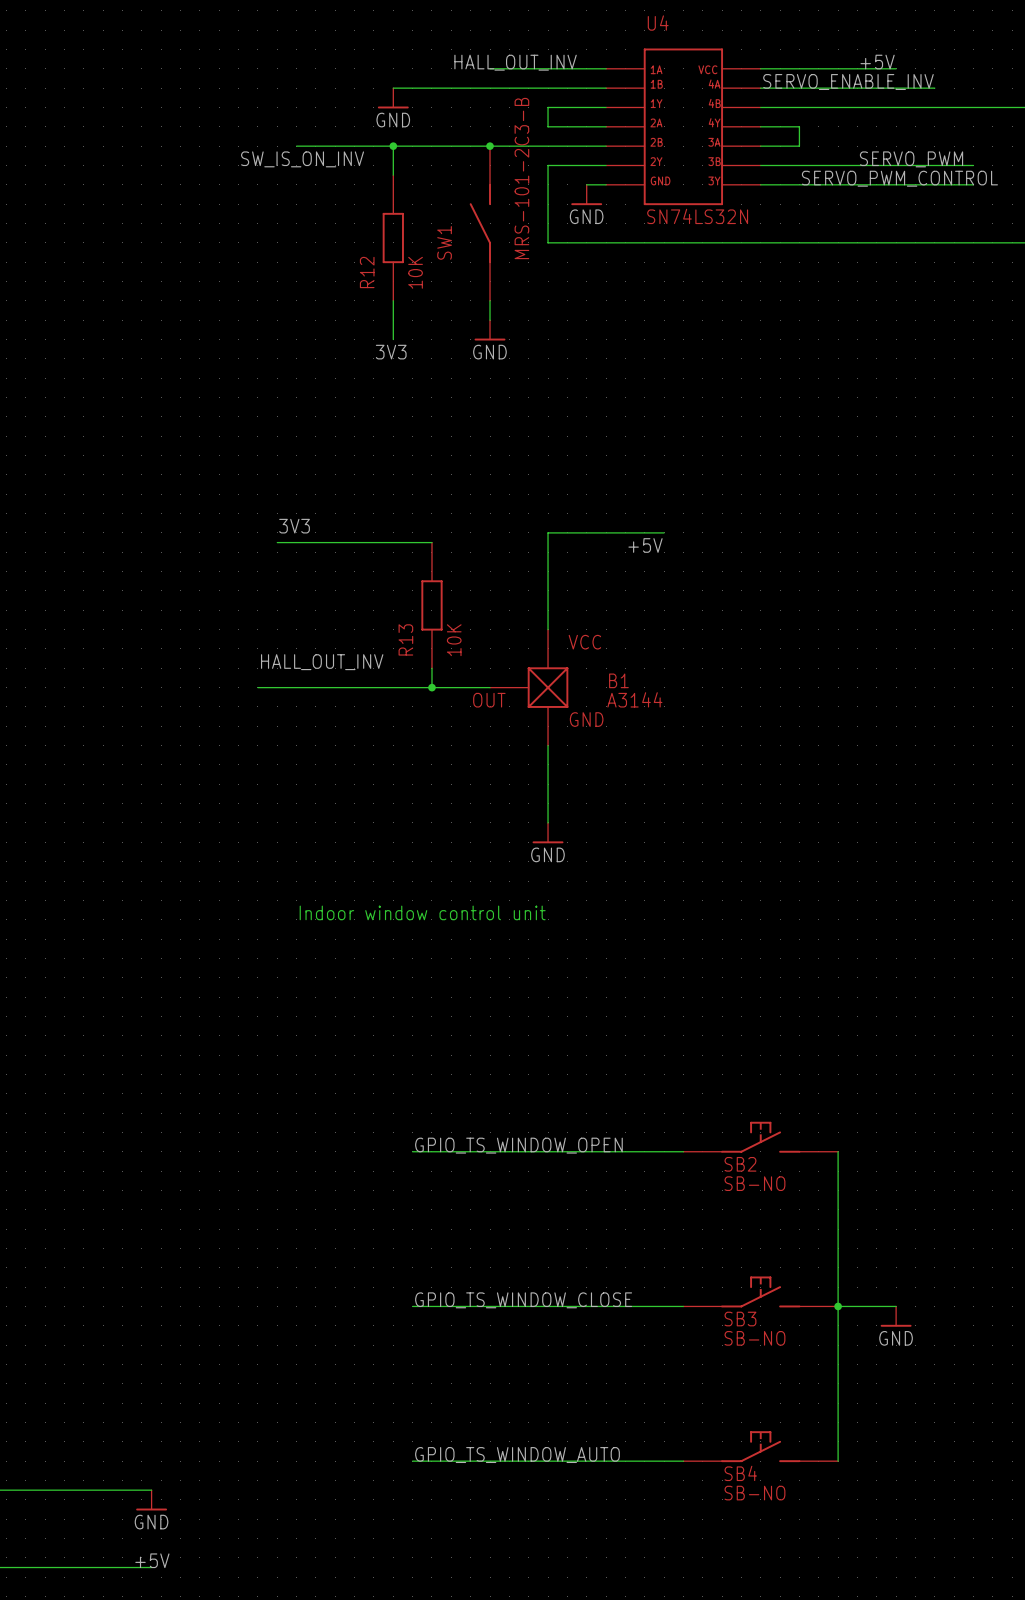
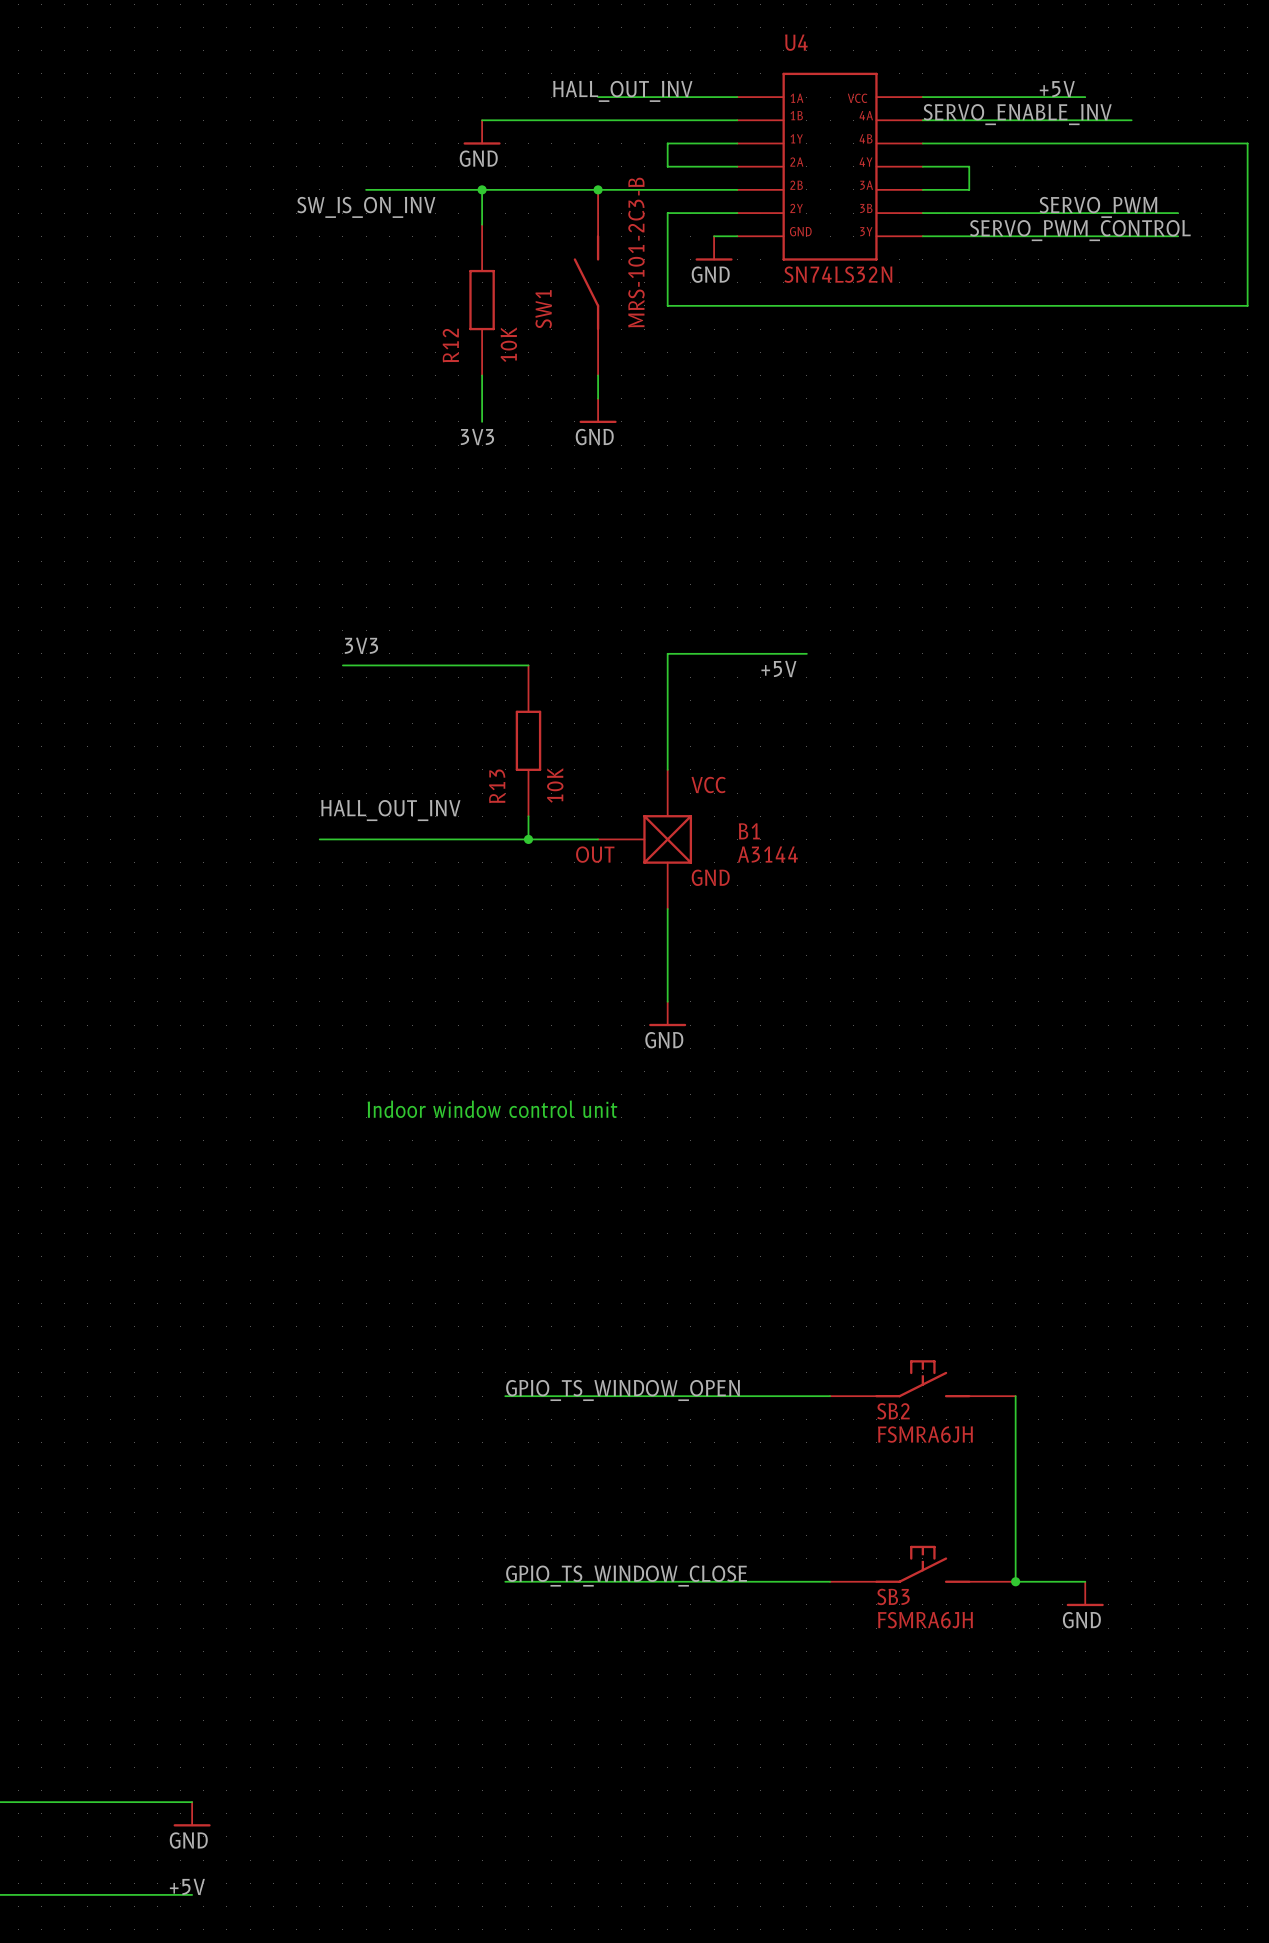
SB2 value: SB-NO (754, 1183) -> FSMRA6JH (925, 1434)
wire: (838, 1306) (838, 1461) -> none
SB3 value: SB-NO (754, 1338) -> FSMRA6JH (925, 1620)
SB4: SB-NO (760, 1446) -> none
label: GPIO_TS_WINDOW_AUTO (517, 1455) -> none
wire: (412, 1461) (683, 1461) -> none

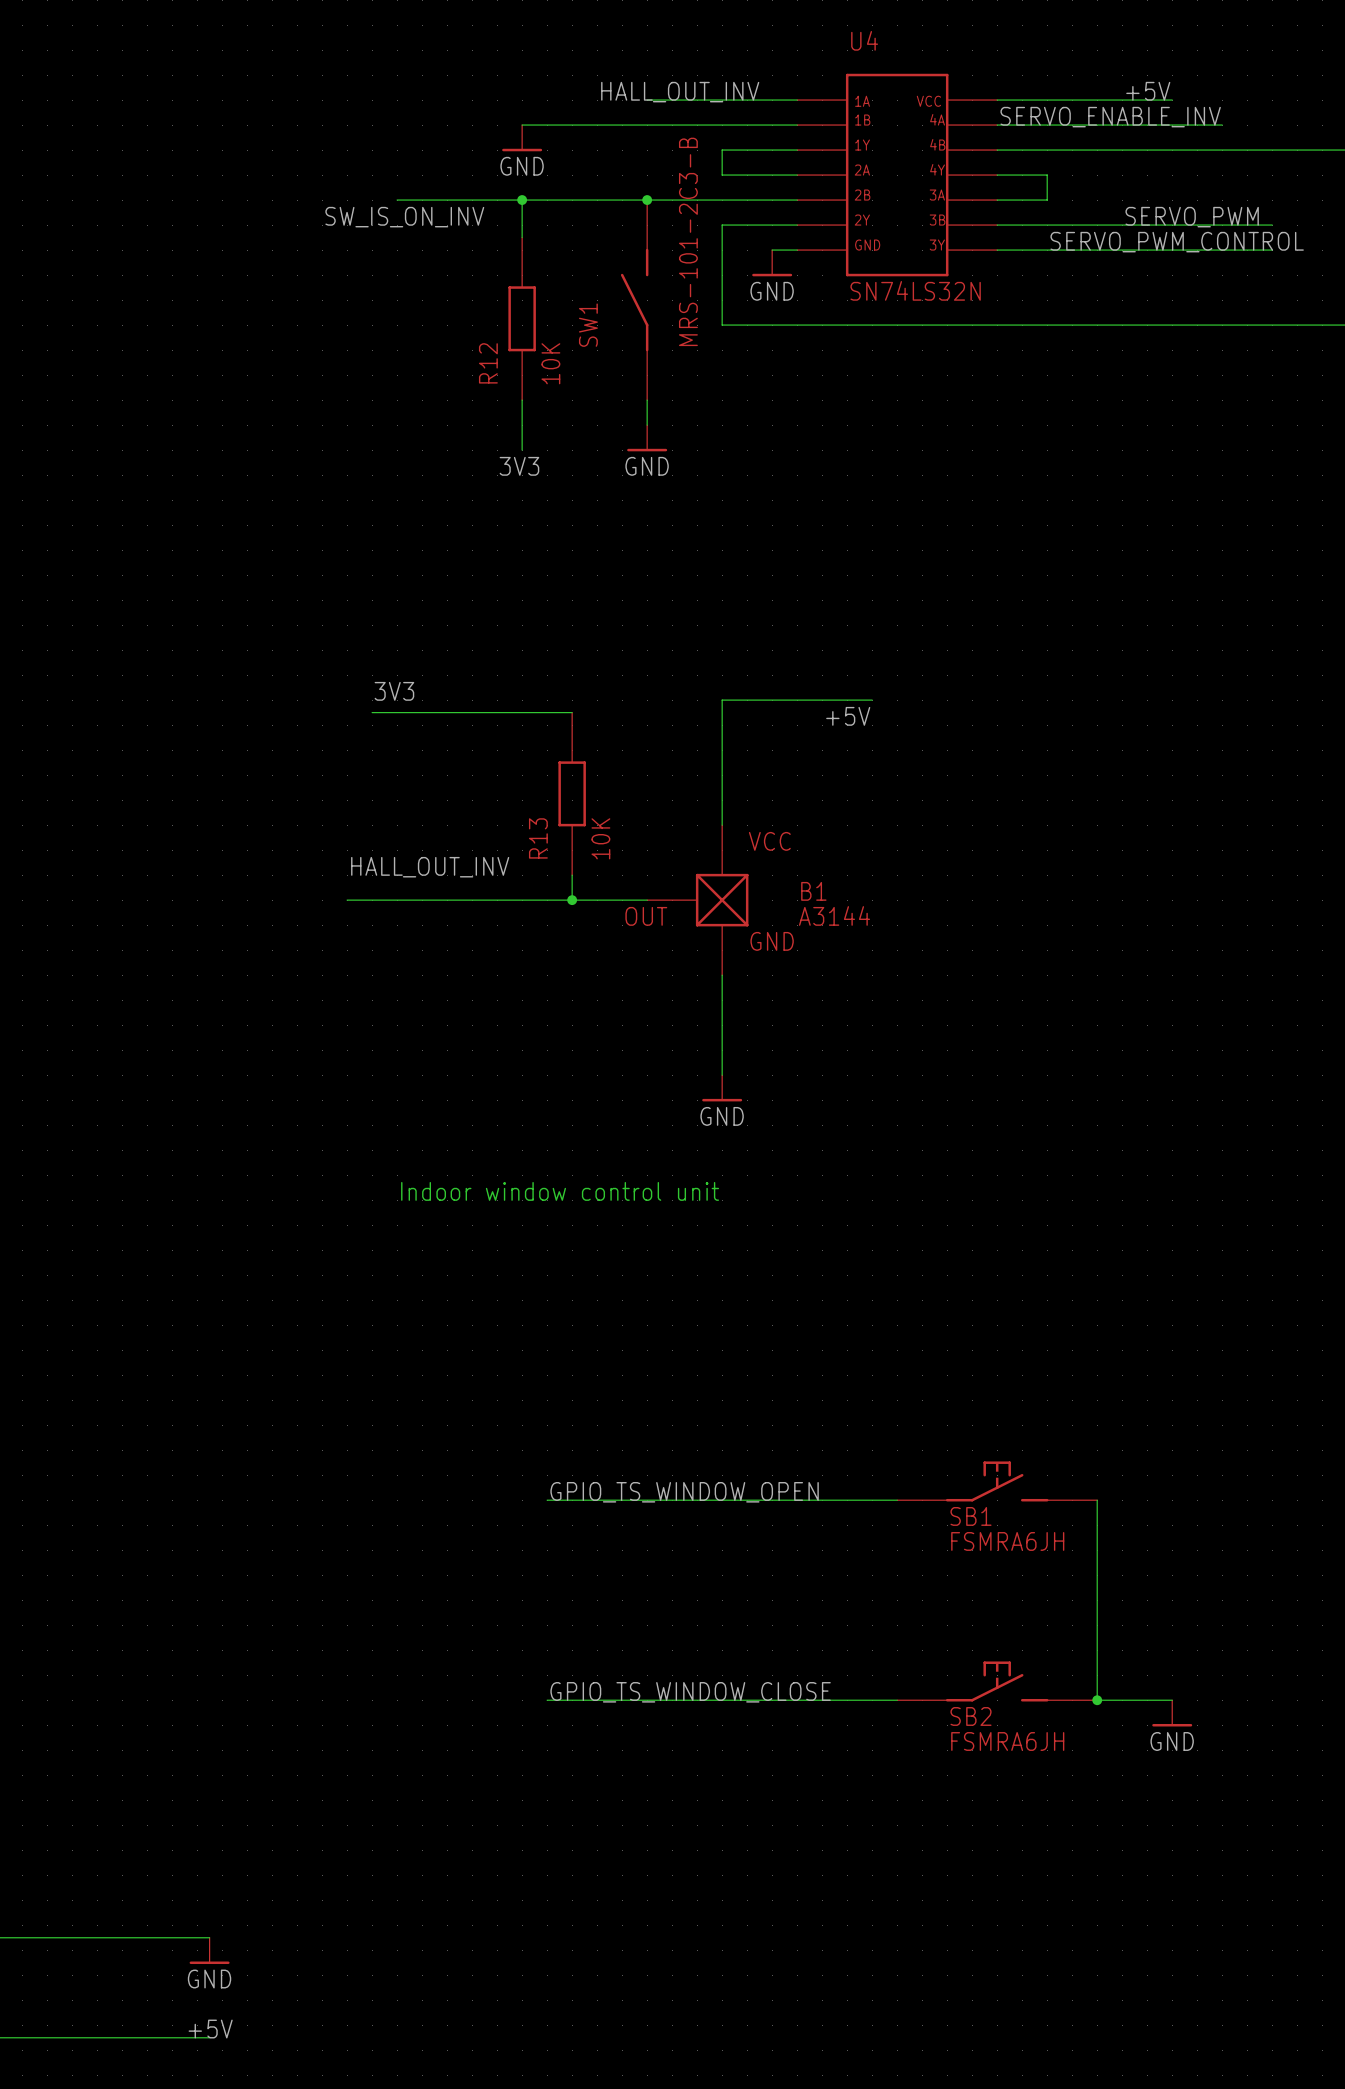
SB2 name: SB2 (893, 1411) -> SB1 (971, 1516)
SB3 name: SB3 (893, 1596) -> SB2 (971, 1716)

